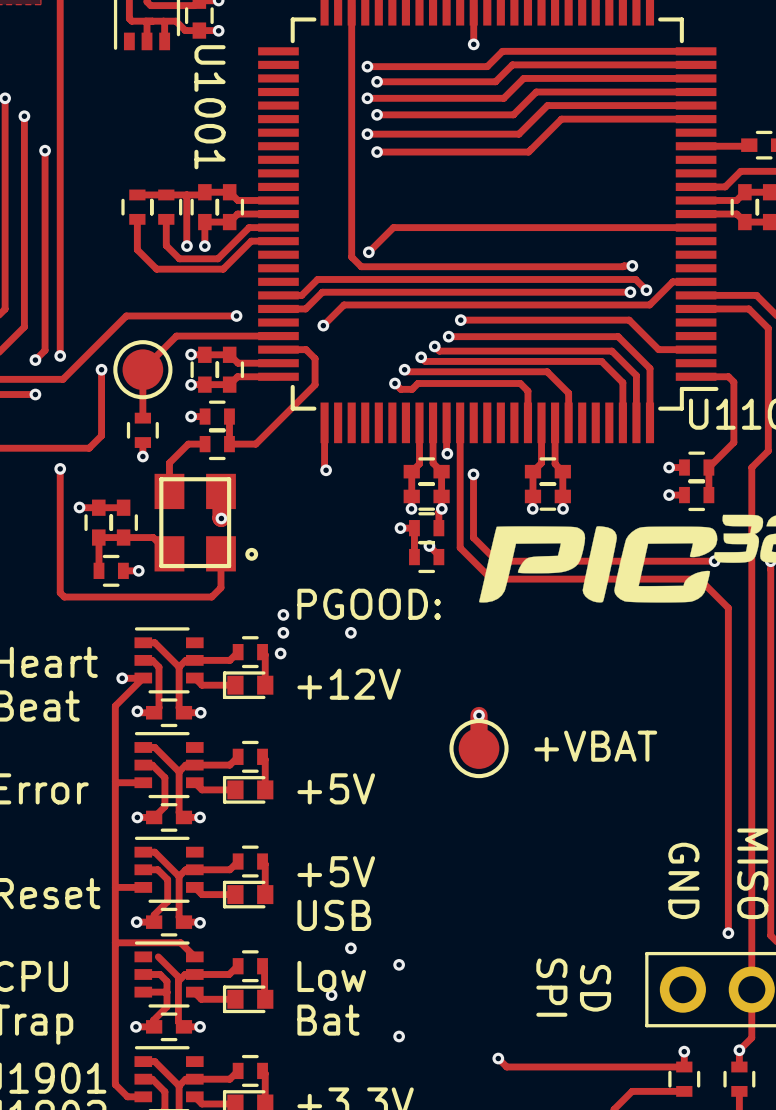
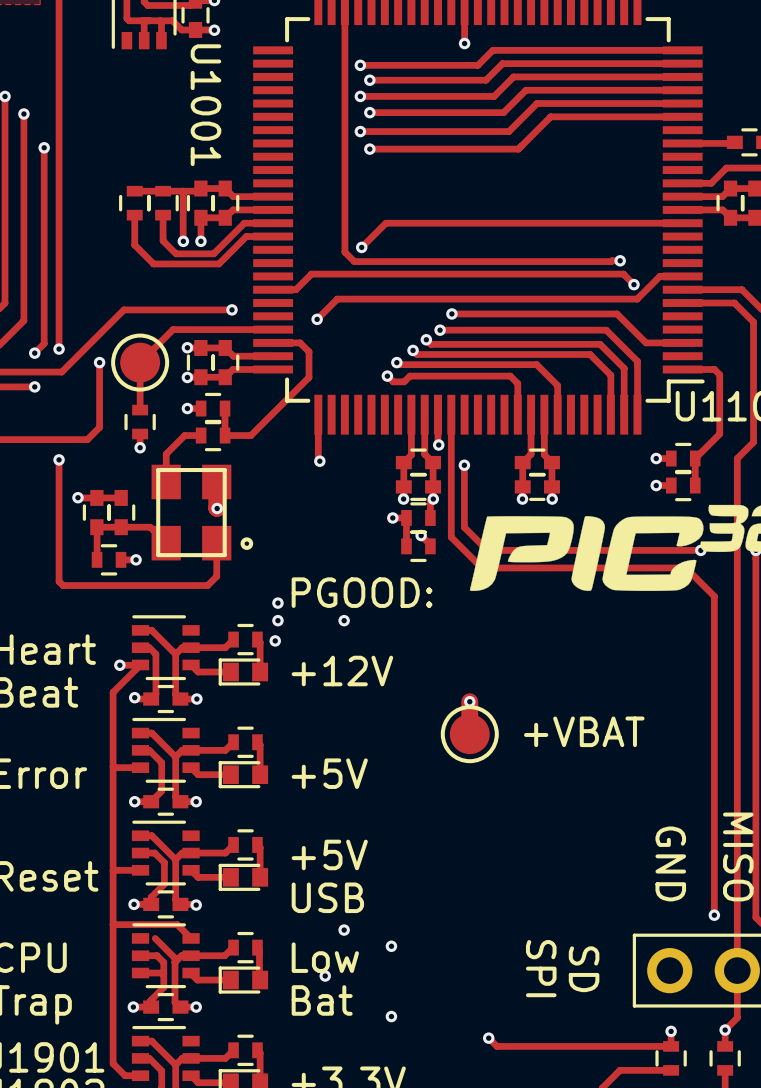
track: (630, 292) (322, 292) (305, 308) (278, 308) -> none
via: (630, 292) -> none

